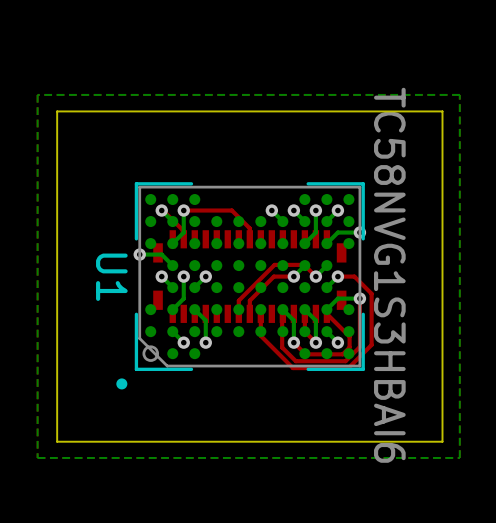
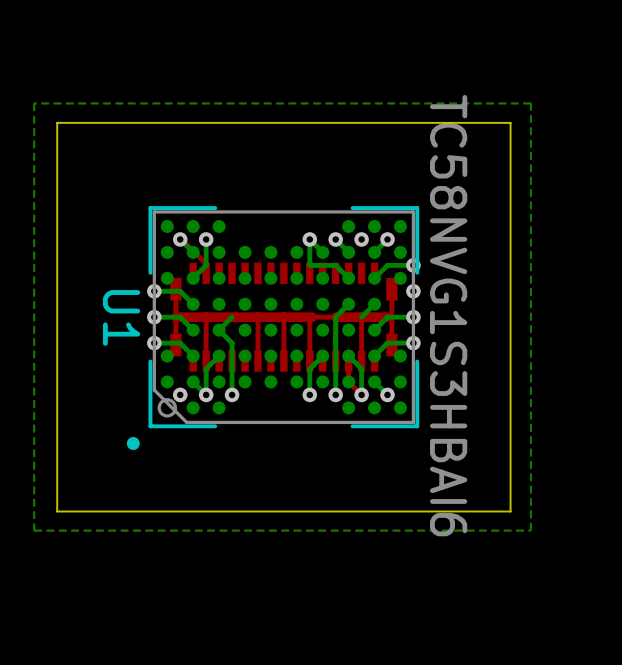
top track: (183, 210) (231, 210) (249, 228) (249, 239) -> none
bottom track: (315, 210) (315, 232) (304, 243) -> (309, 239) (309, 265) (335, 265) (348, 278)
top track: none -> (175, 289) (175, 345)
top track: none -> (391, 289) (391, 345)
via: none -> (413, 291)
via: none -> (154, 317)
bottom track: none -> (180, 317) (154, 317)
via: (161, 276) -> none
top track: none -> (206, 317) (206, 361)
bottom track: (183, 276) (183, 298) (172, 309) -> (154, 343) (180, 343) (193, 356)
via: (183, 276) -> none
via: (205, 276) -> none
top track: none -> (257, 317) (257, 361)
top track: none -> (309, 317) (309, 361)
top track: (273, 276) (249, 300) -> (283, 317) (283, 345)
top track: none -> (312, 317) (175, 317)
bottom track: none -> (335, 317) (335, 369)
via: (293, 276) -> none
top track: (315, 276) (304, 264) (274, 264) (238, 300) (238, 313) -> (361, 317) (361, 361)
via: (315, 276) -> none
top track: none -> (387, 317) (335, 317) (335, 361)
via: (337, 276) -> none
top track: (341, 276) (354, 276) (371, 293) (371, 344) (348, 368) (293, 368) (260, 335) (260, 313) -> none
bottom track: none -> (413, 317) (387, 317)
via: none -> (413, 317)
via: none -> (154, 343)
top track: (359, 298) (359, 346) (345, 361) (295, 361) (282, 347) (282, 313) -> none
bottom track: (194, 309) (205, 320) -> (219, 330) (232, 343) (232, 369)
bottom track: none -> (219, 356) (206, 369) (206, 394)
bottom track: (282, 309) (293, 320) -> (322, 356) (309, 369) (309, 394)
top track: (326, 313) (349, 336) (349, 347) (342, 354) (305, 354) (293, 342) -> none
via: none -> (180, 394)
via: none -> (309, 394)

